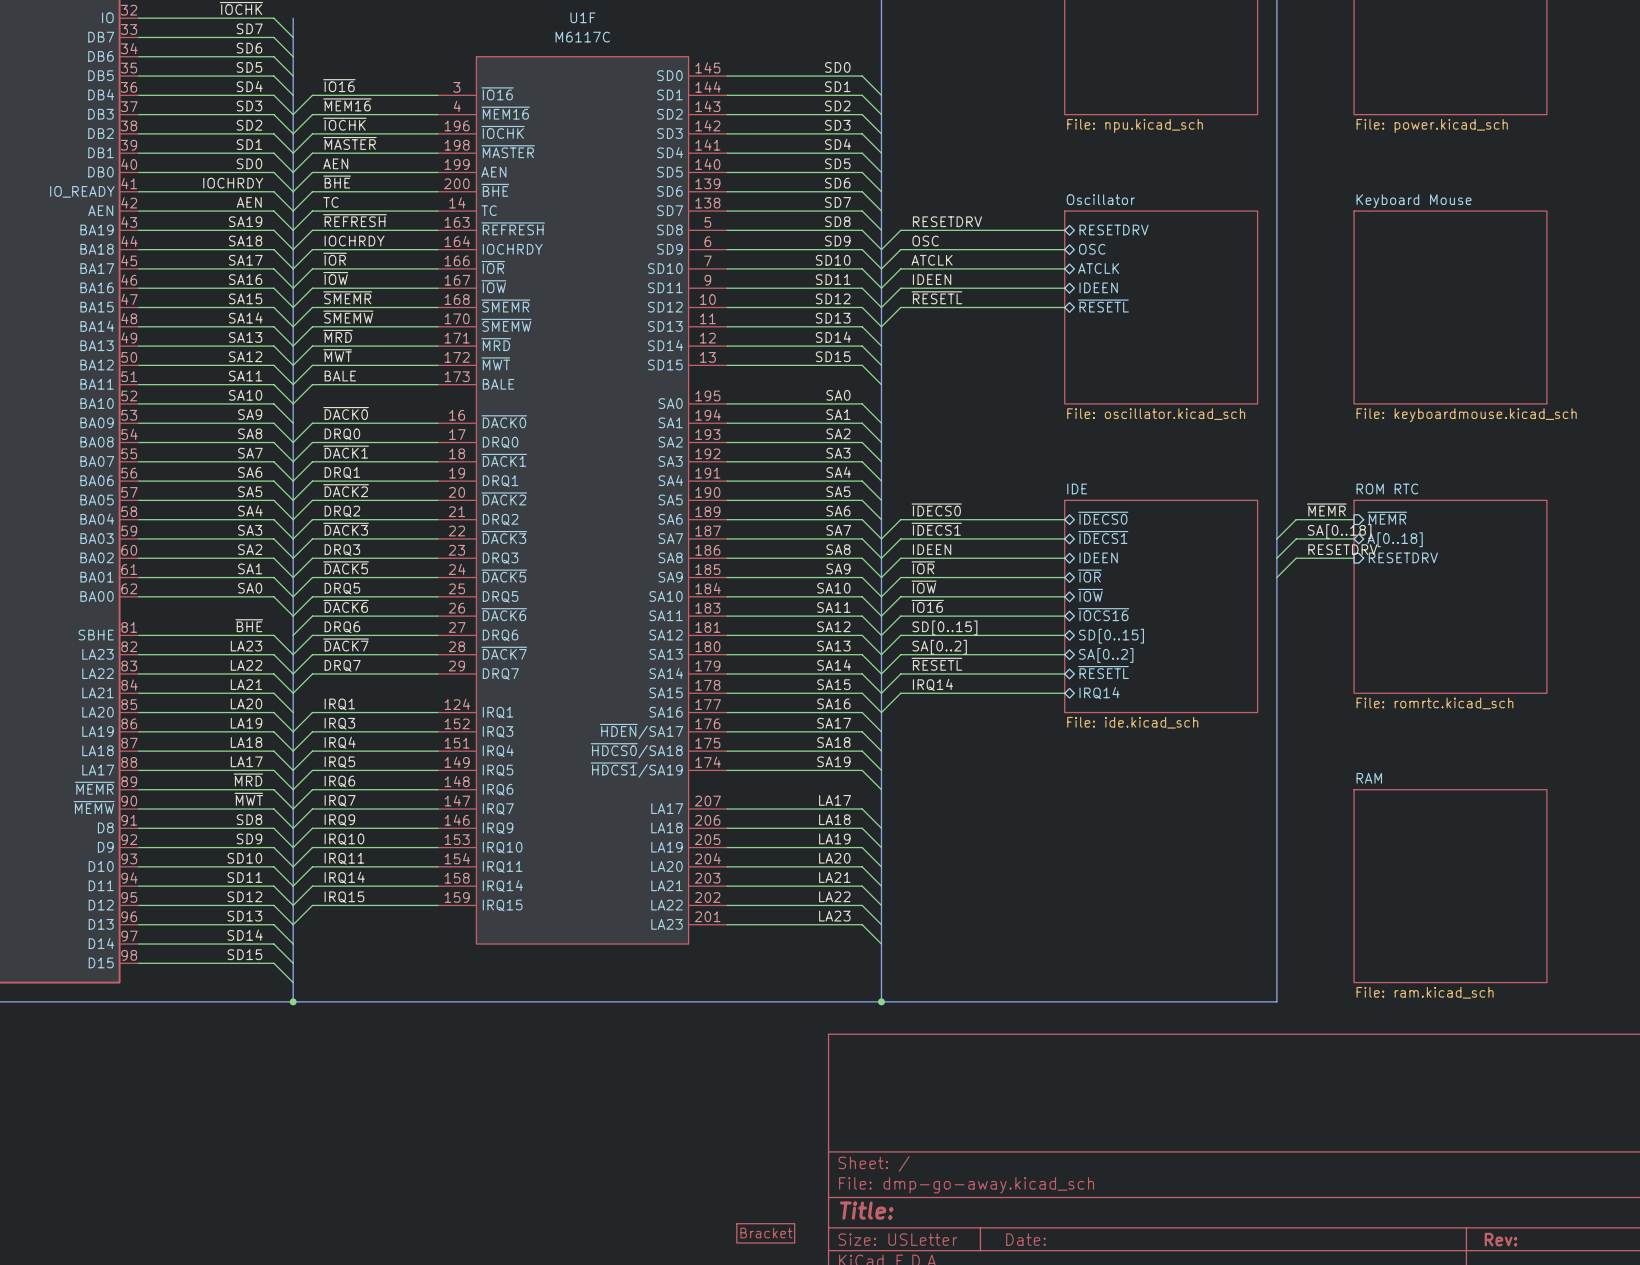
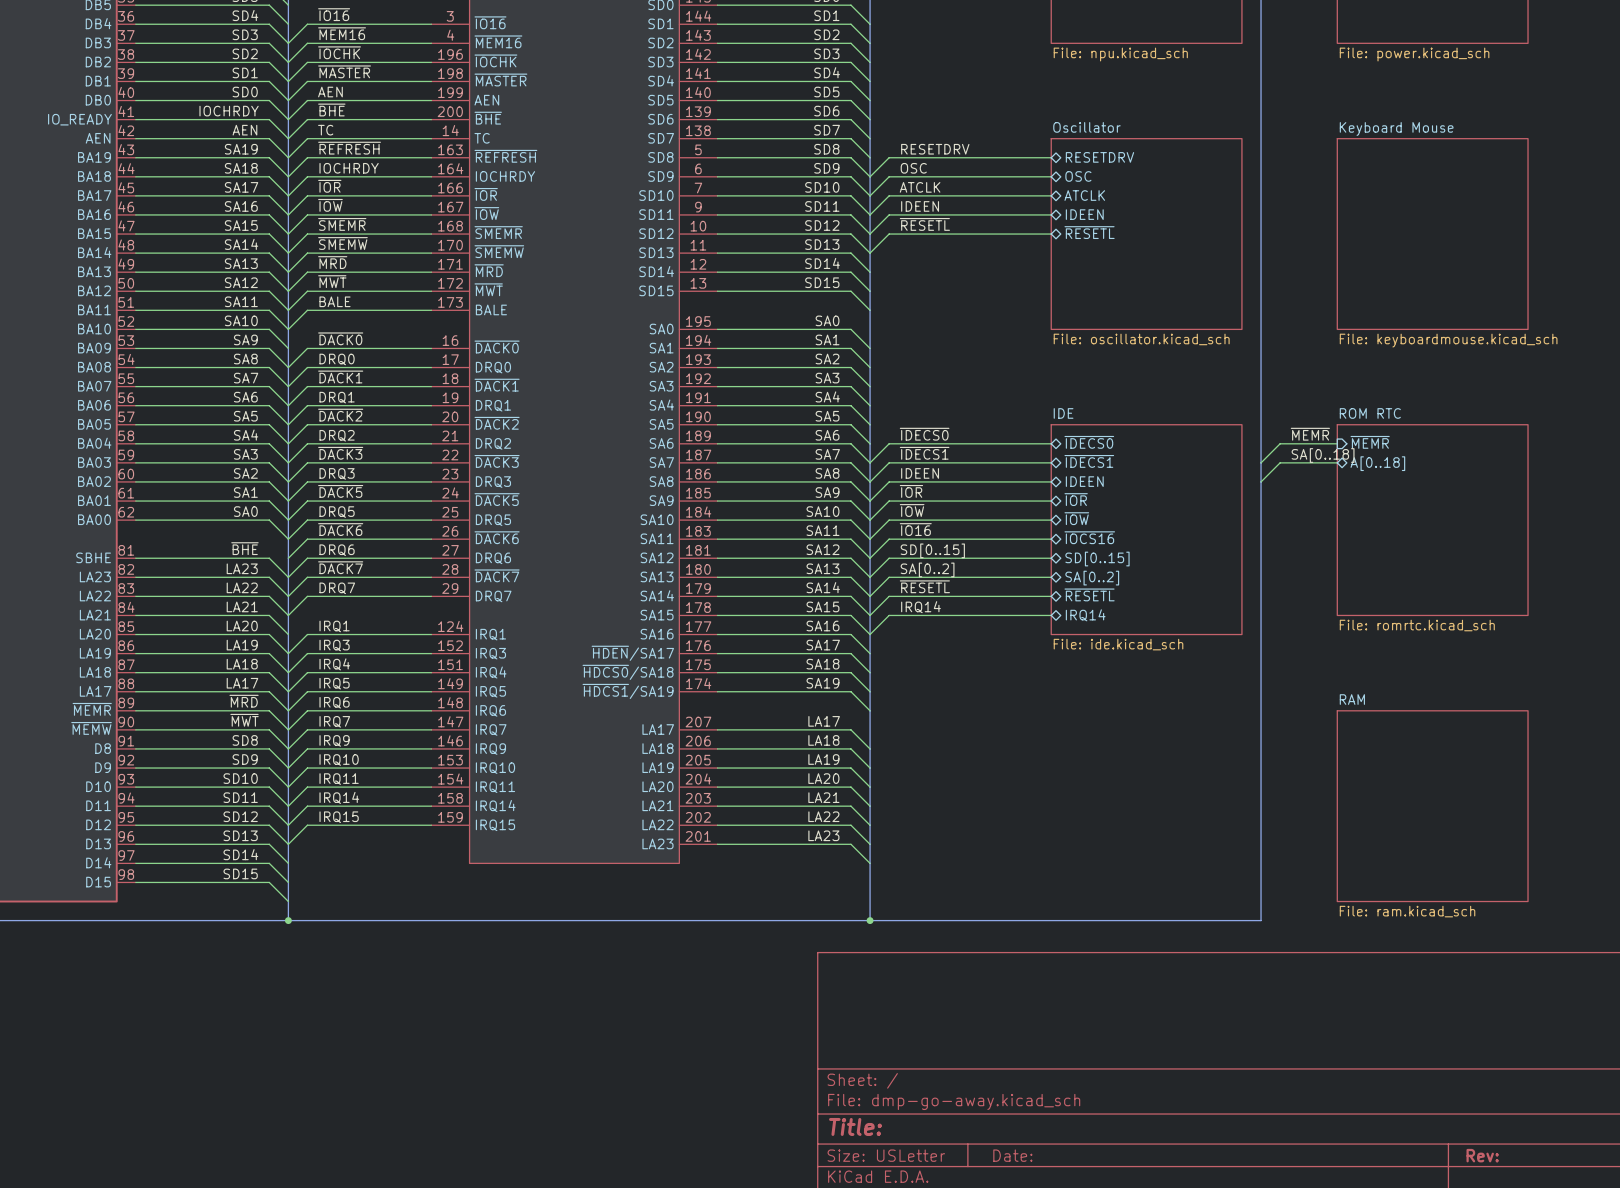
label: RESETDRV (1342, 549) -> none
sheet pin: RESETDRV (1403, 557) -> none
wire: (1354, 558) (1296, 558) (1276, 577) -> none
part: (765, 1233) -> none

